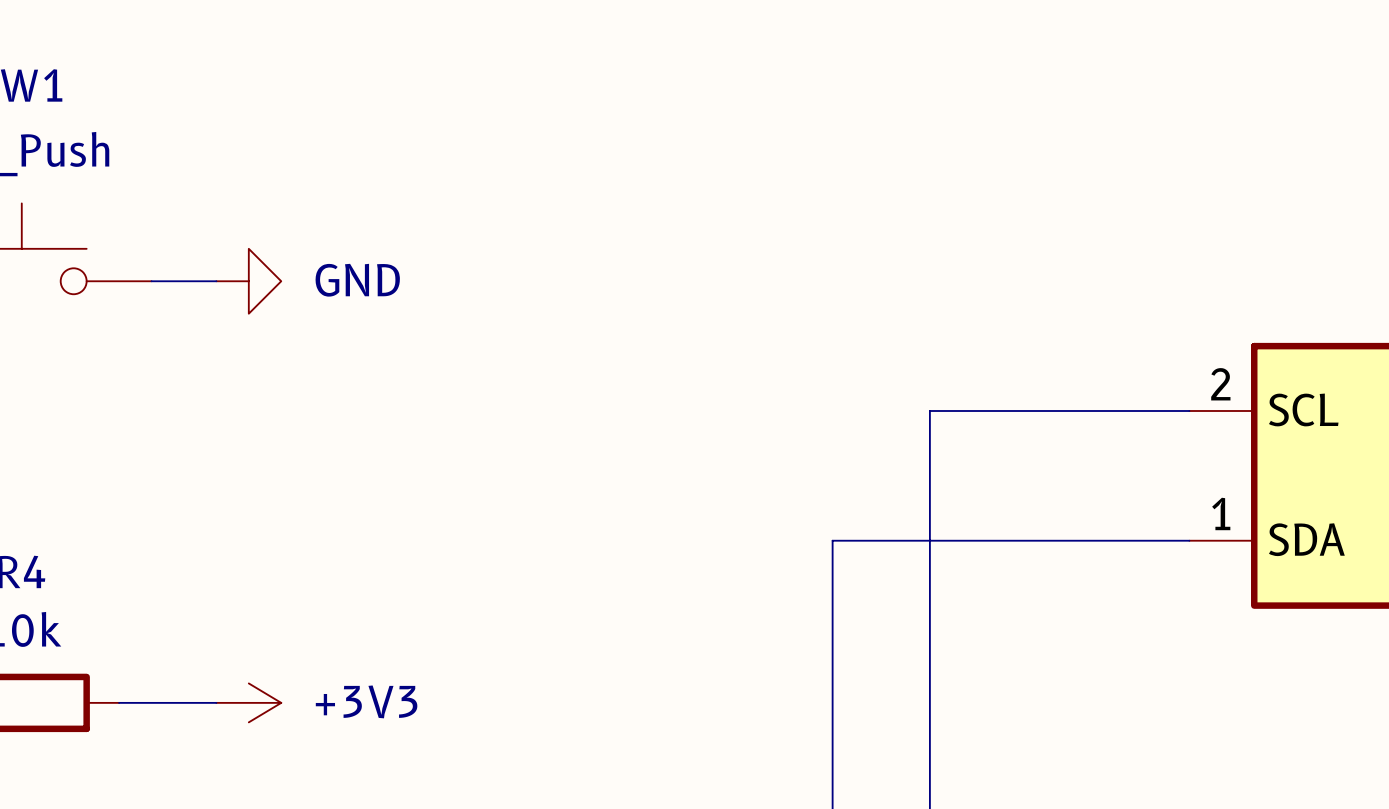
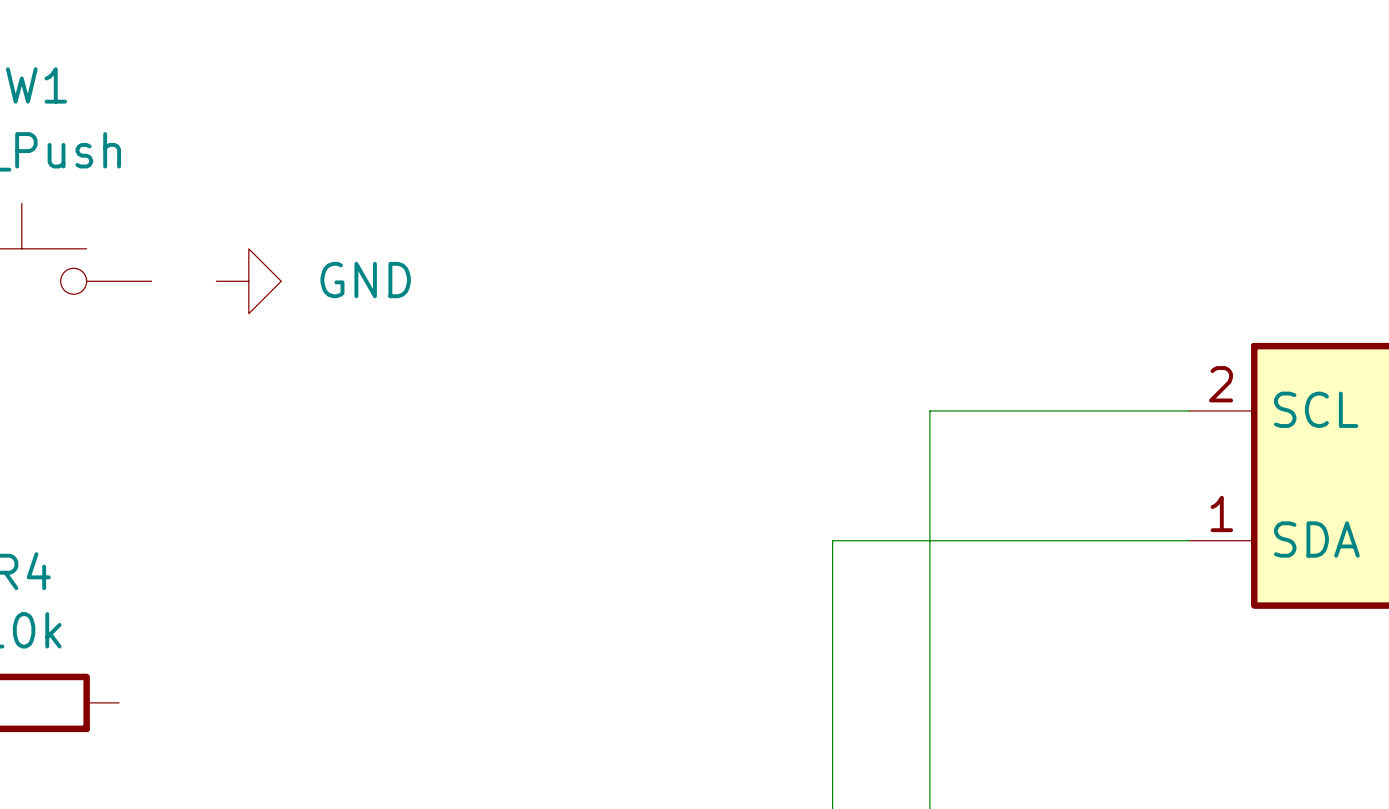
wire: (151, 281) (216, 281) -> none
wire: (119, 702) (216, 702) -> none
power symbol: +3V3 (248, 702) -> none

